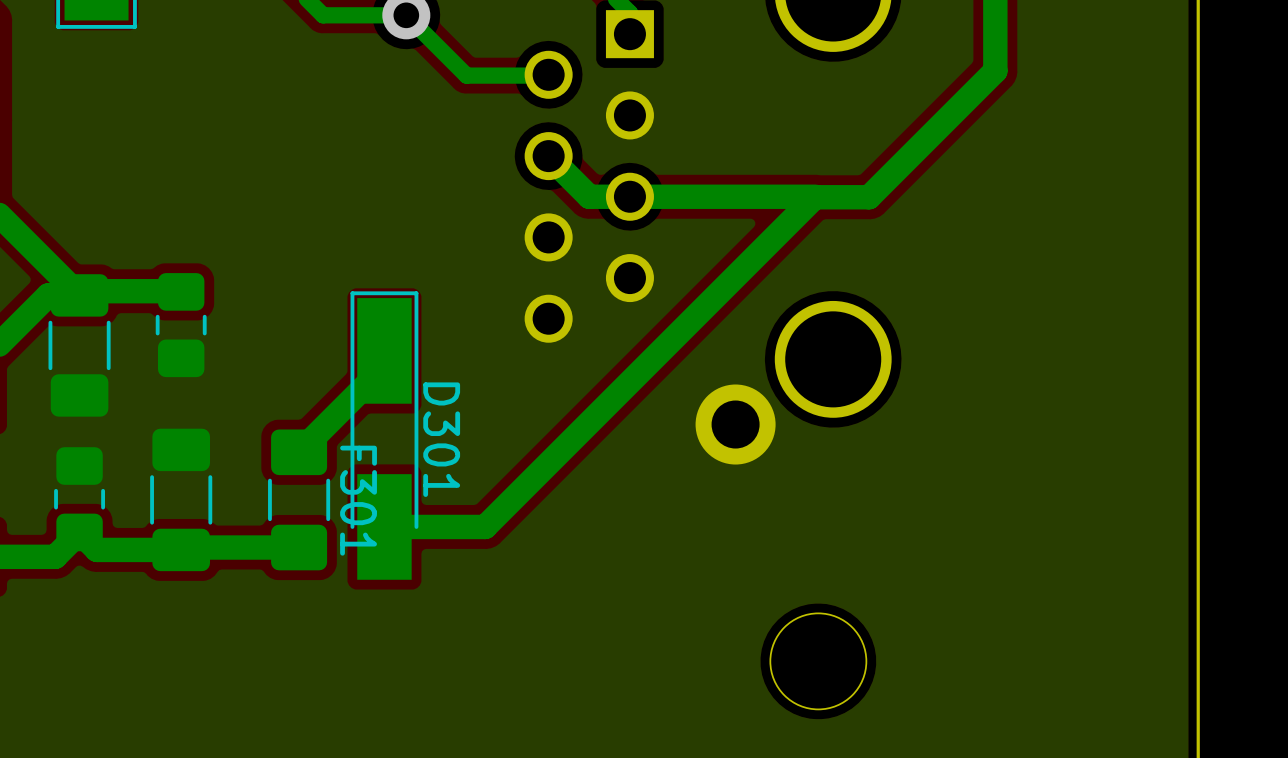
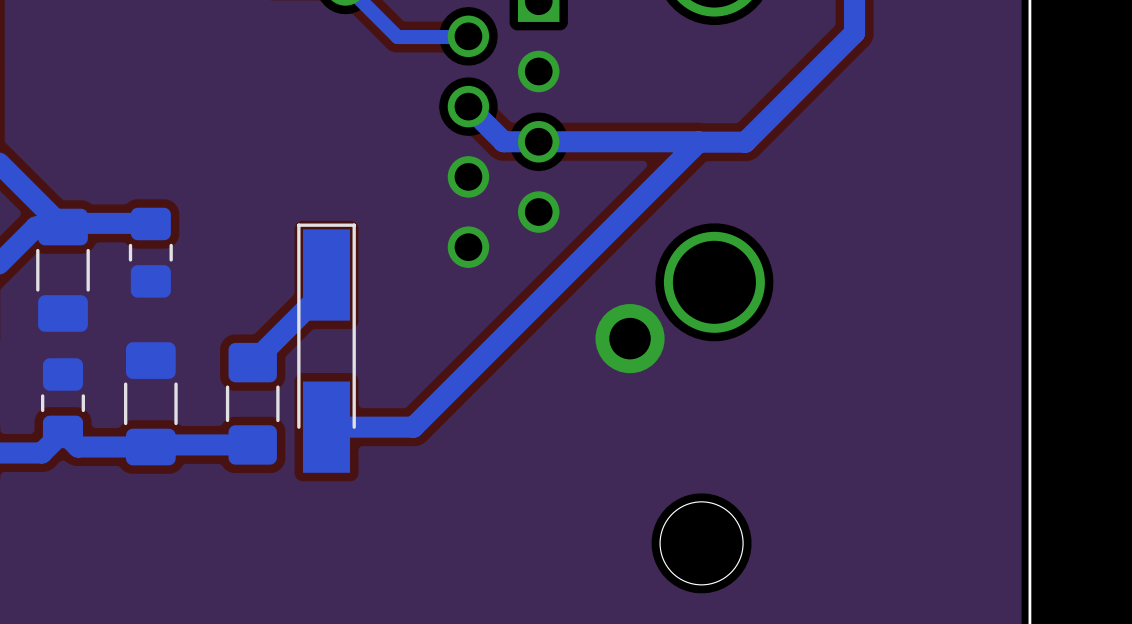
D301 name: D301 (441, 439) -> none
F301 name: F301 (358, 500) -> none

